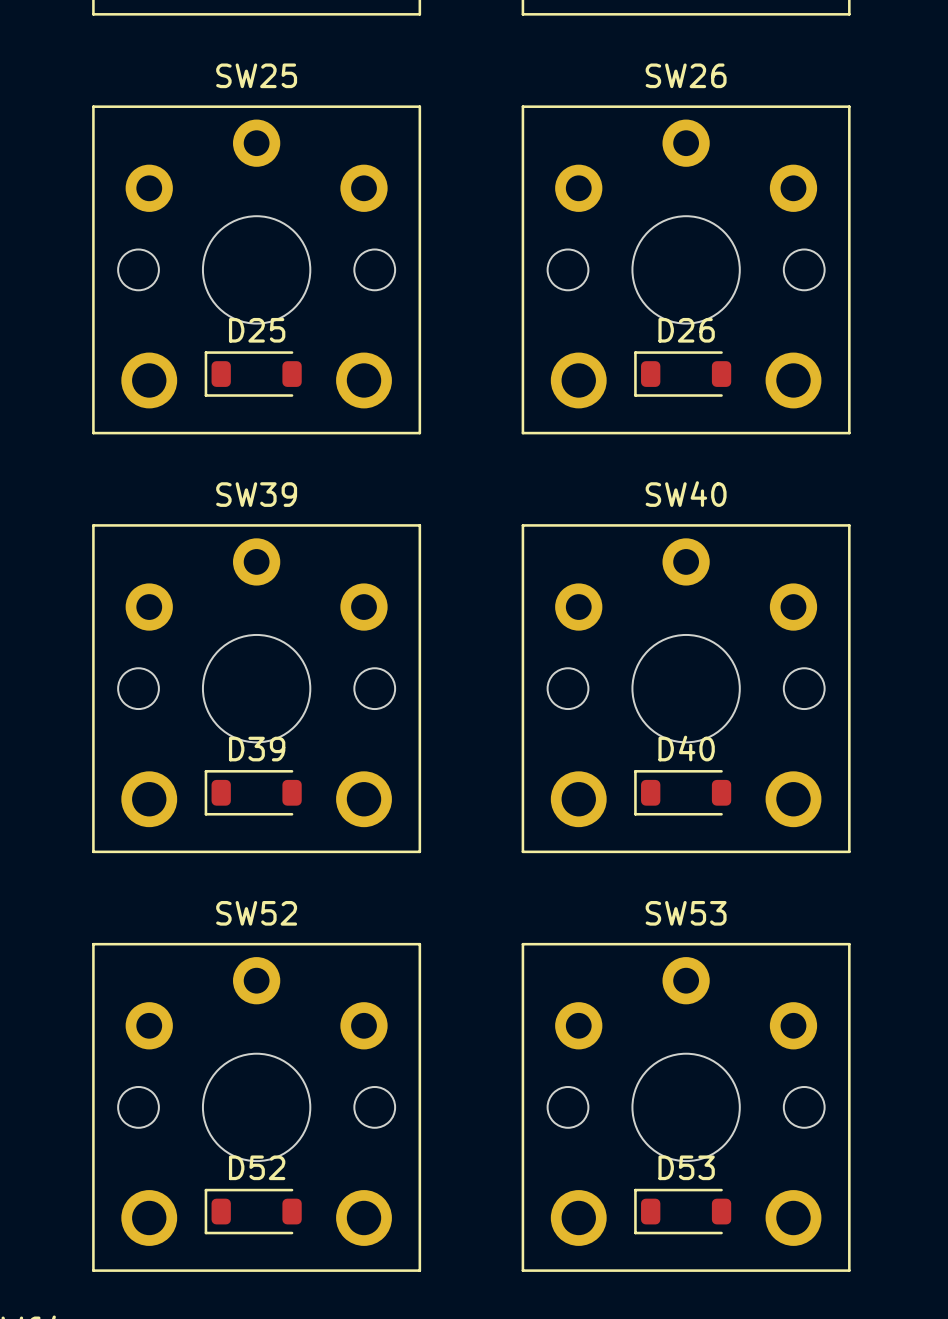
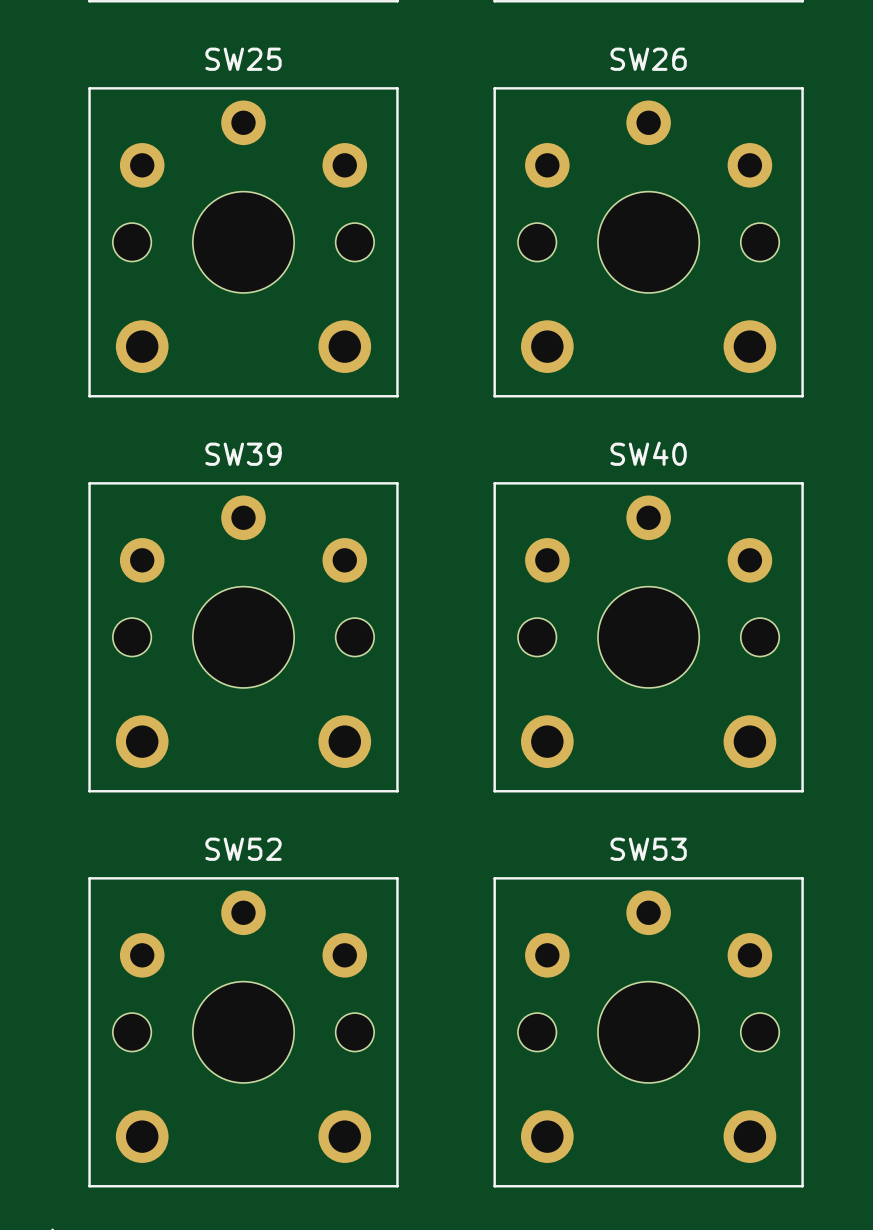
D25: (253, 374) -> none
D26: (682, 374) -> none
D39: (253, 792) -> none
D40: (682, 792) -> none
D52: (253, 1211) -> none
D53: (682, 1211) -> none

